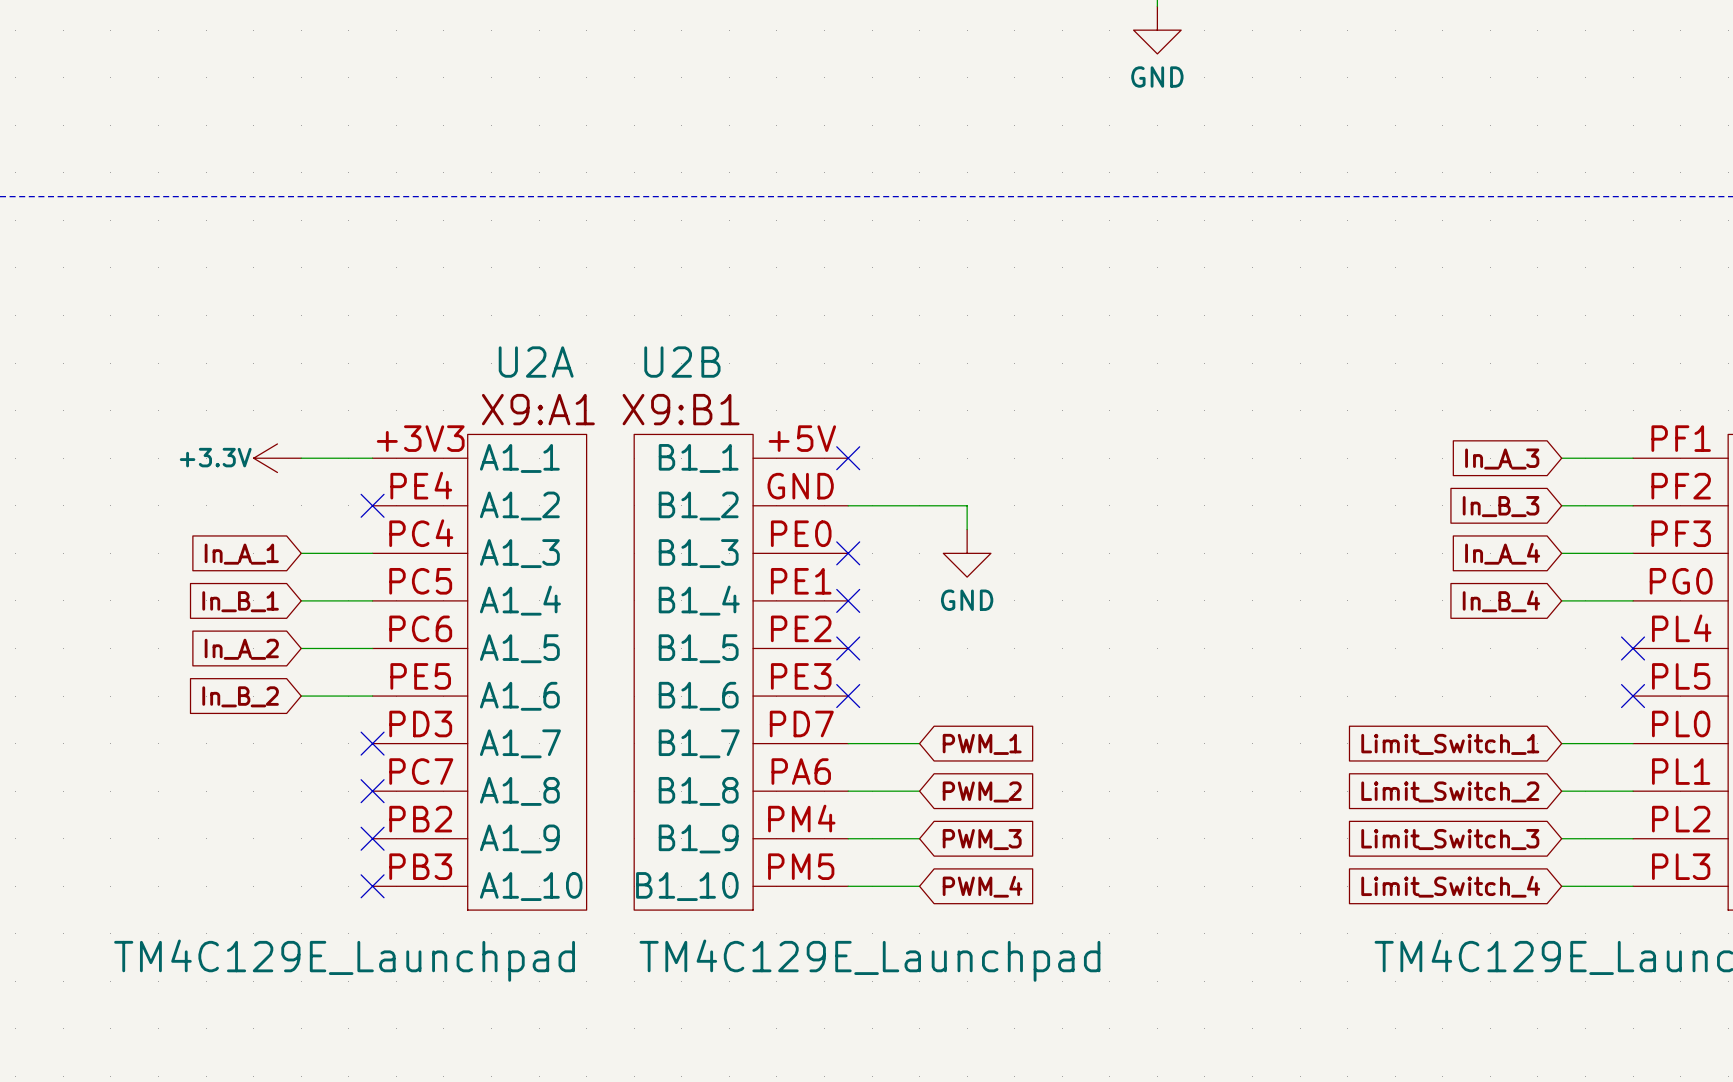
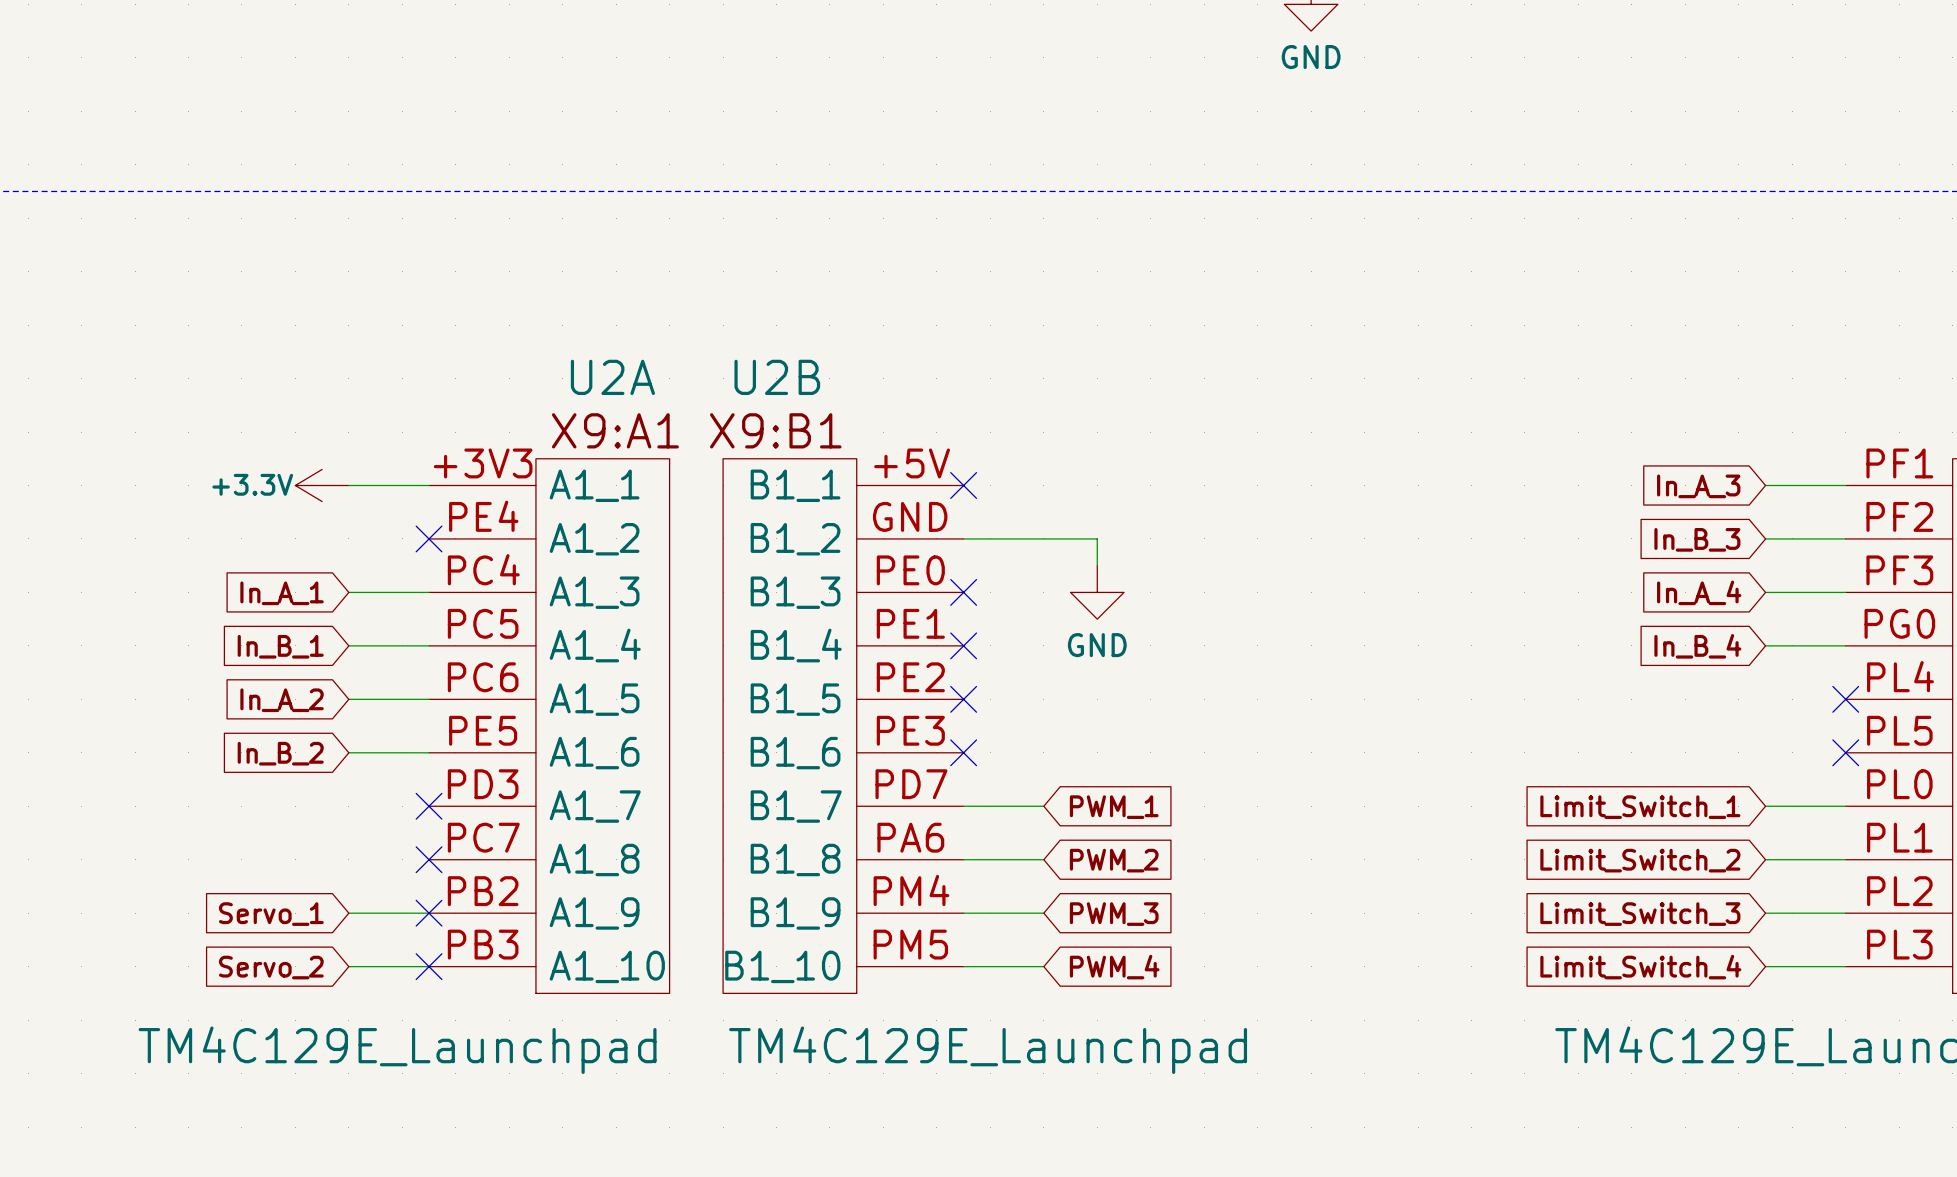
wire: none -> (348, 913) (429, 913)
global label: none -> Servo_1 (271, 914)
wire: none -> (348, 966) (429, 966)
global label: none -> Servo_2 (271, 967)

